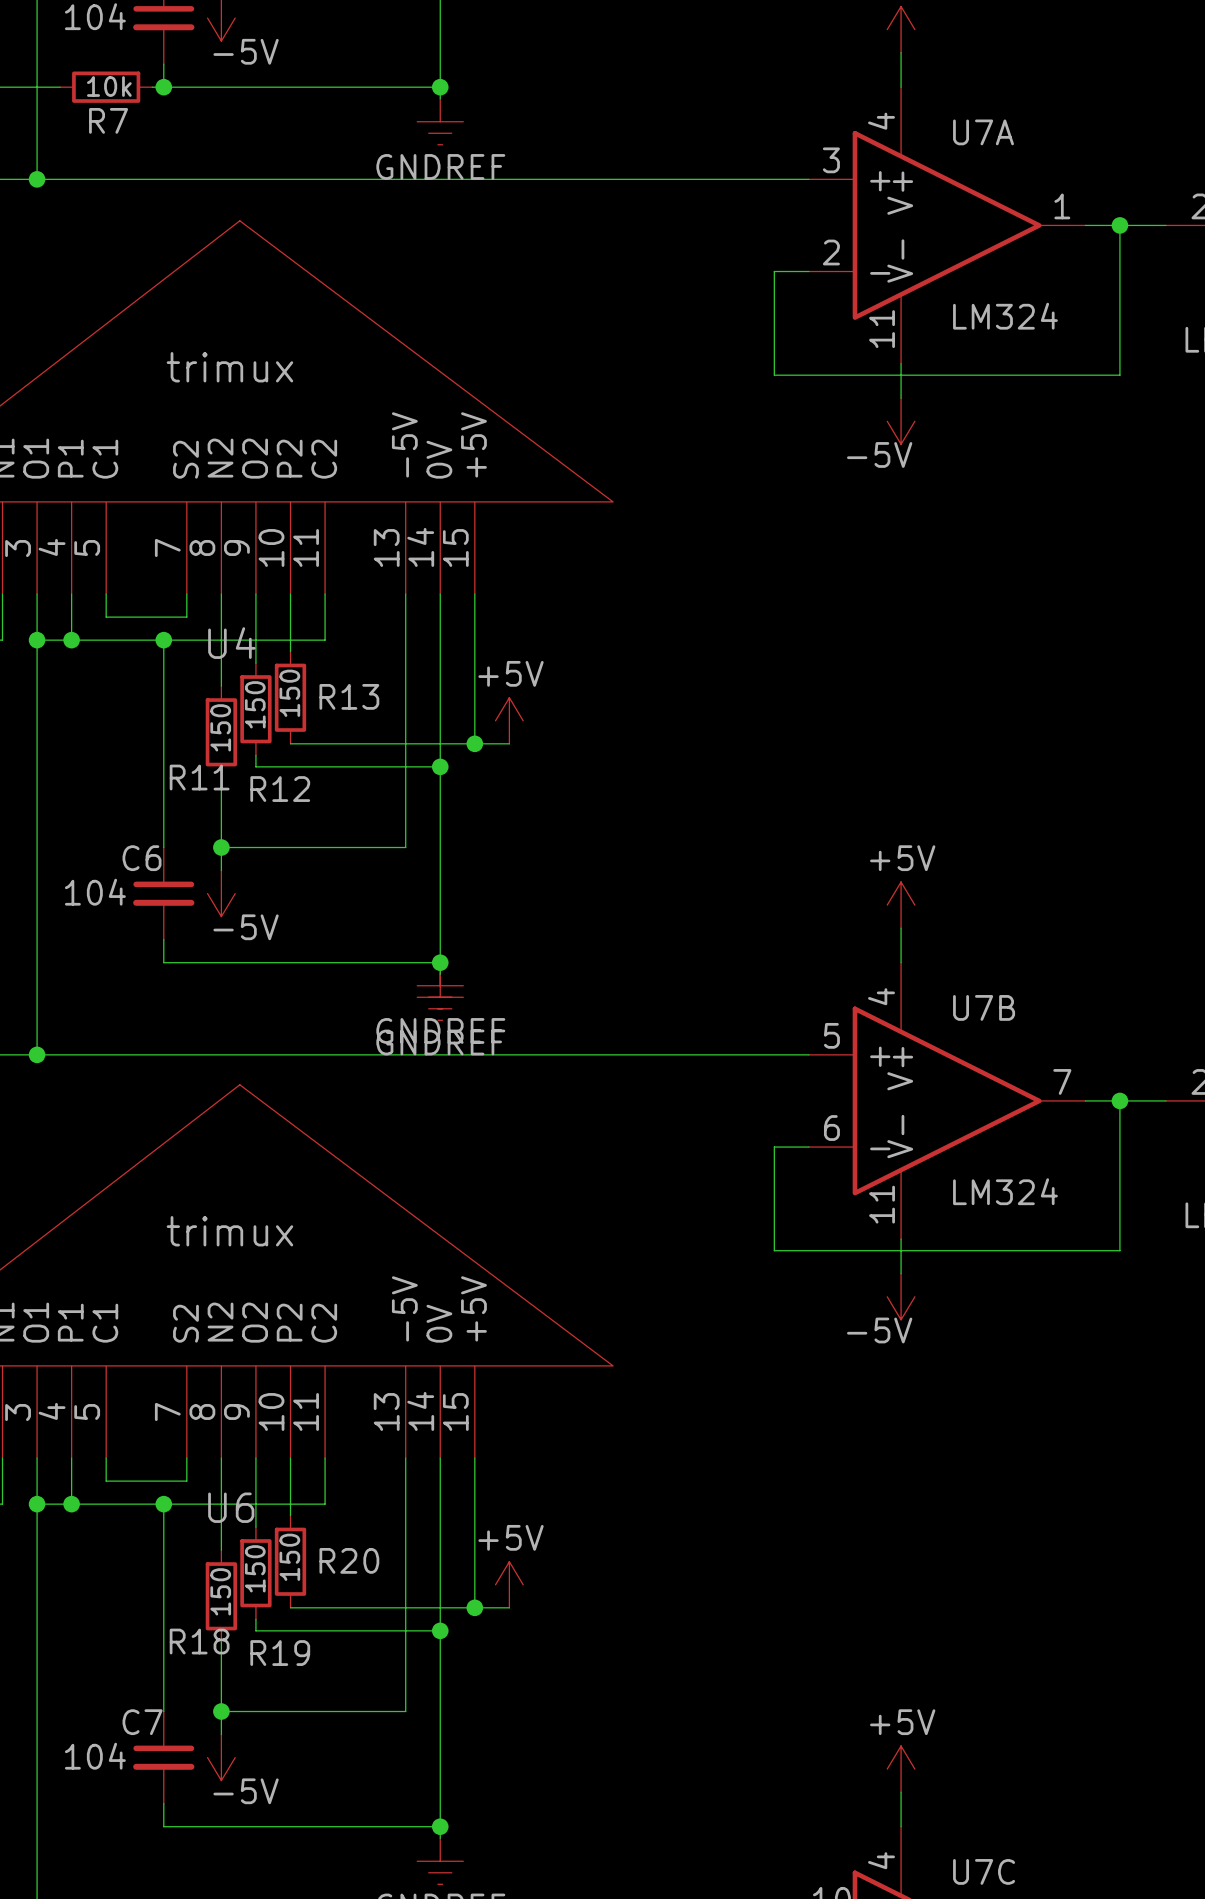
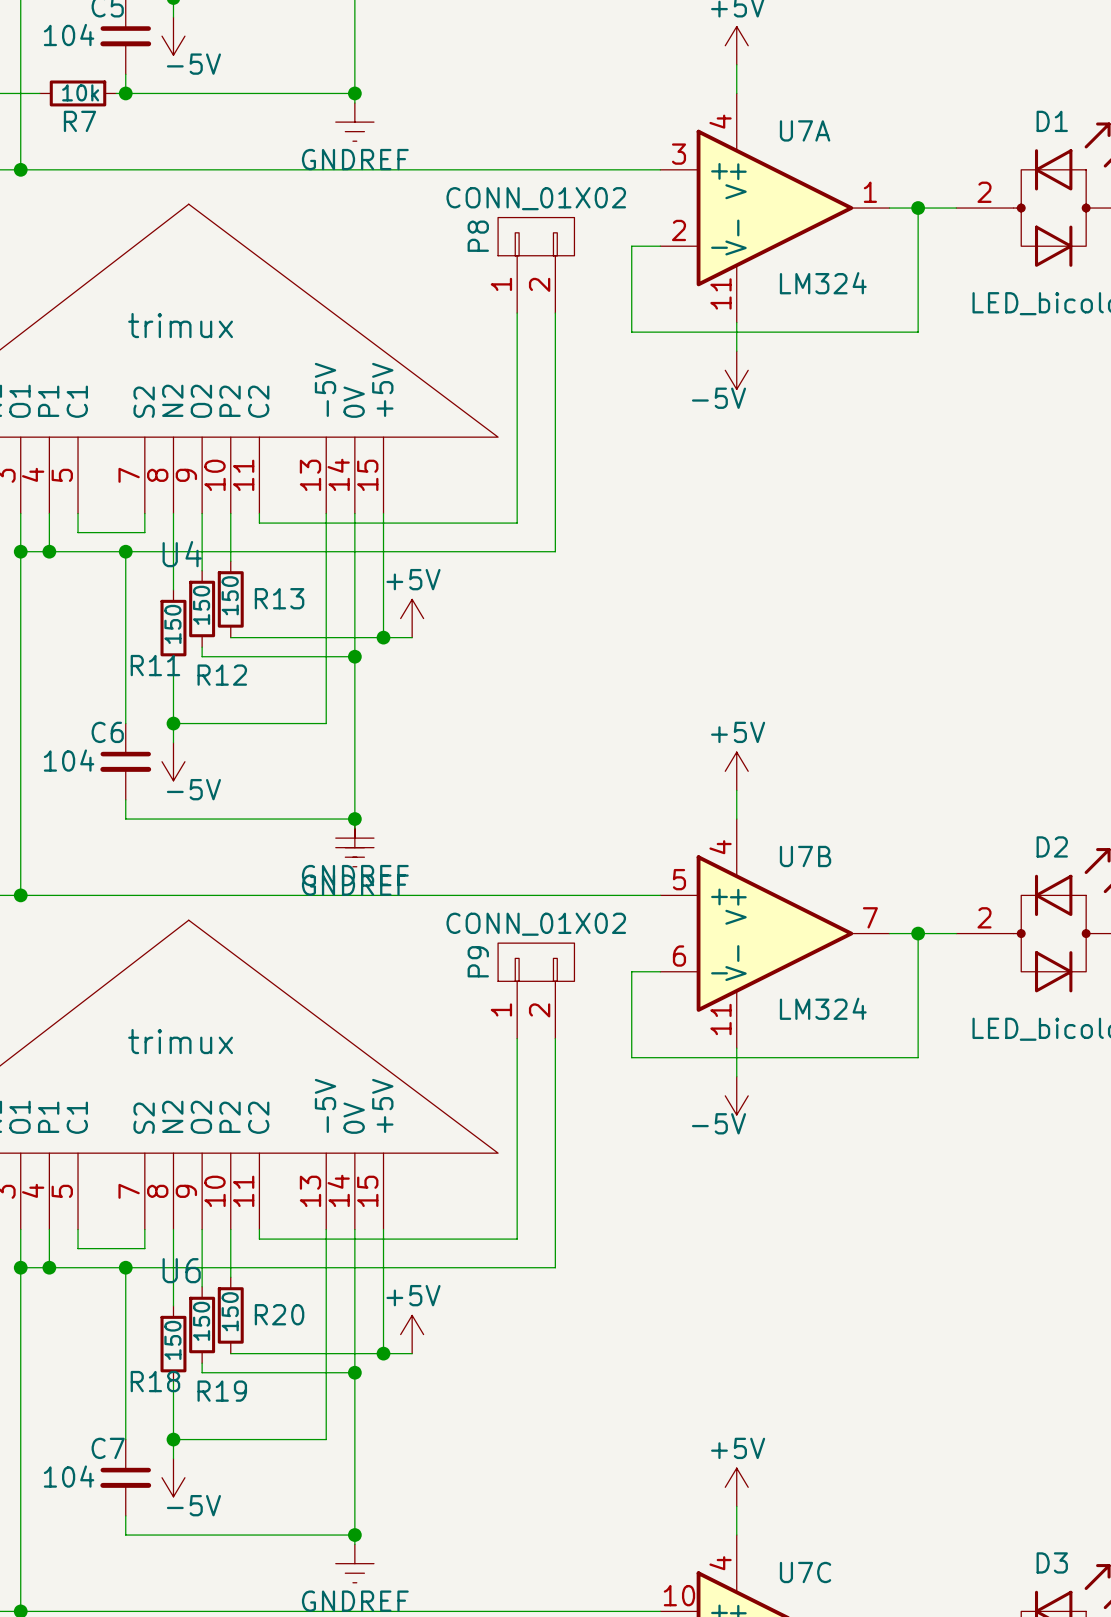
P8: none -> CONN_01X02 (536, 265)
wire: none -> (555, 313) (555, 551) (259, 551)
wire: (325, 605) (325, 640) -> (259, 523) (517, 523) (517, 313)
P9: none -> CONN_01X02 (536, 990)
wire: none -> (555, 1038) (555, 1267) (259, 1267)
wire: (325, 1469) (325, 1504) -> (259, 1239) (517, 1239) (517, 1038)

